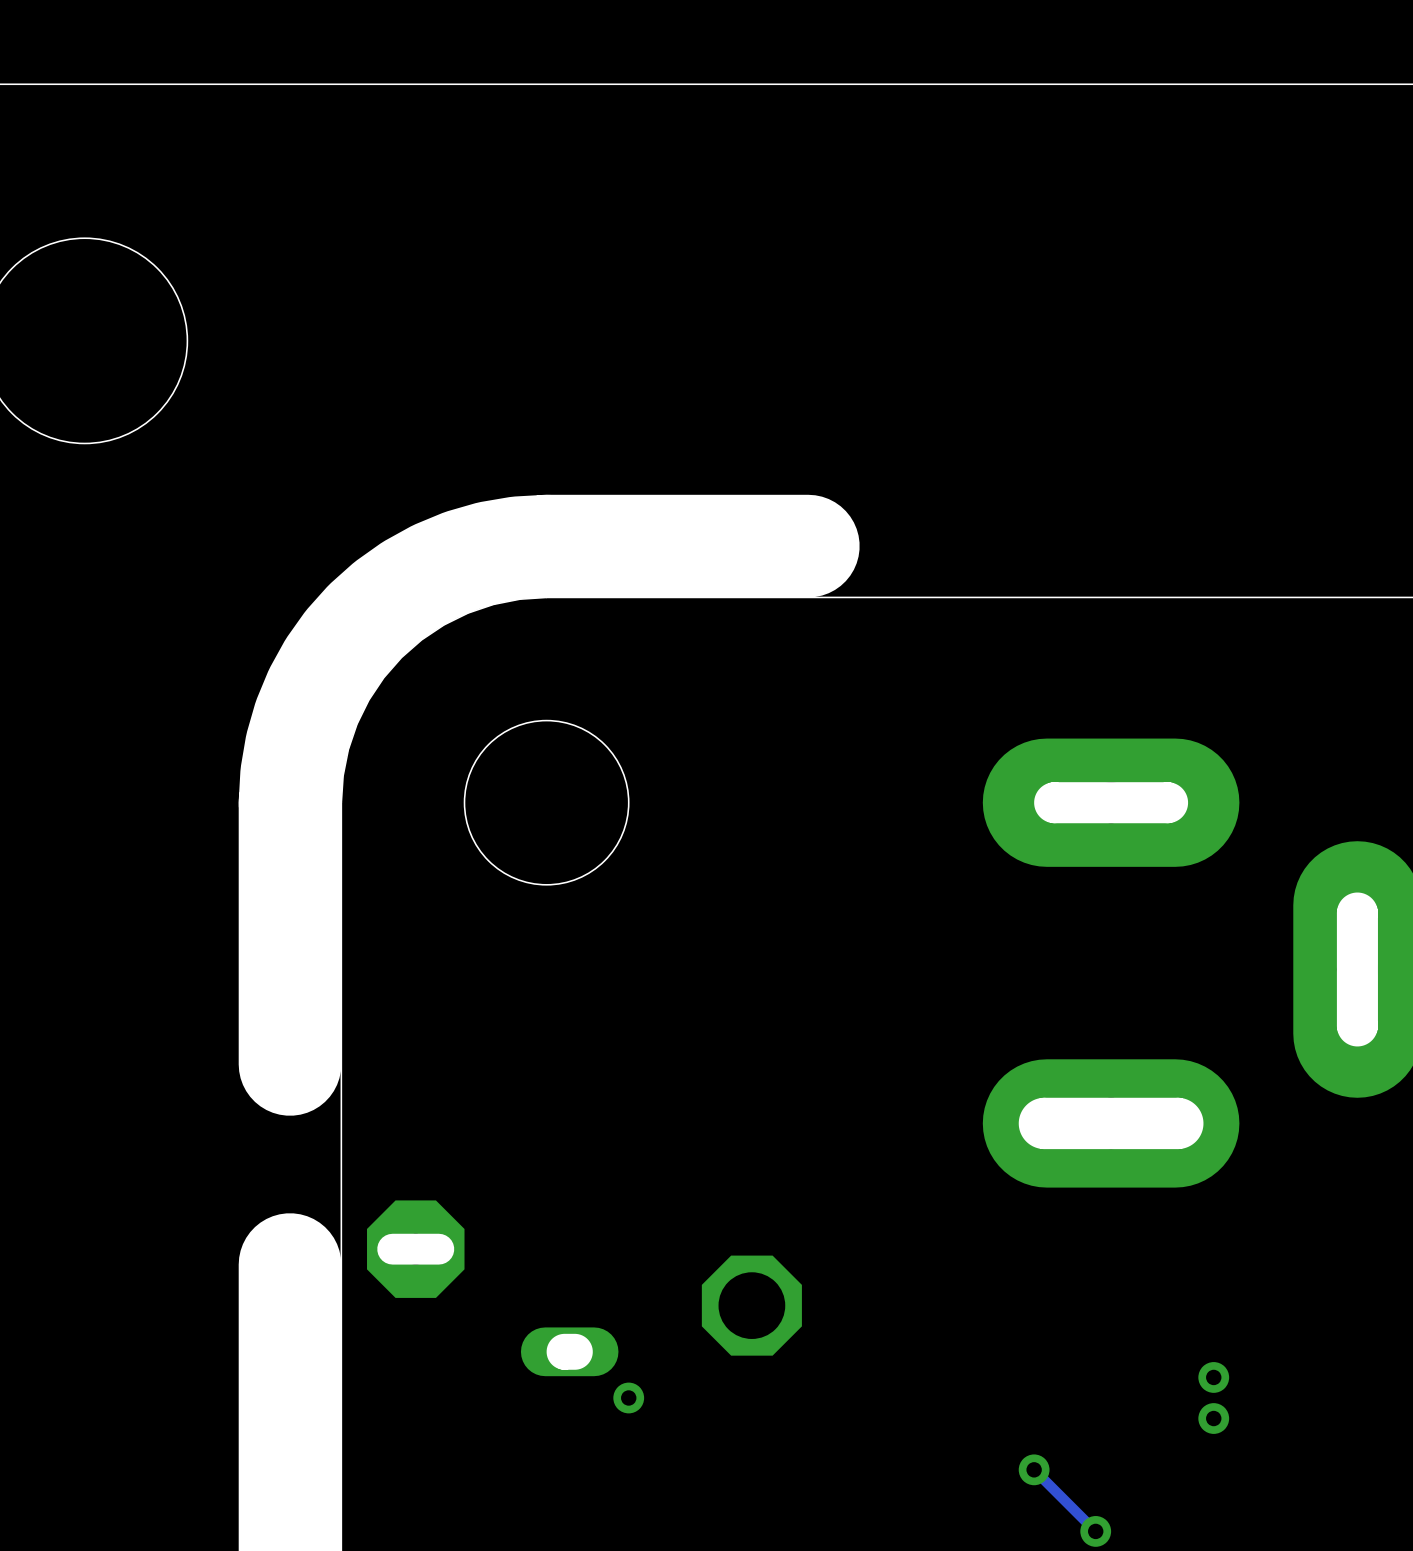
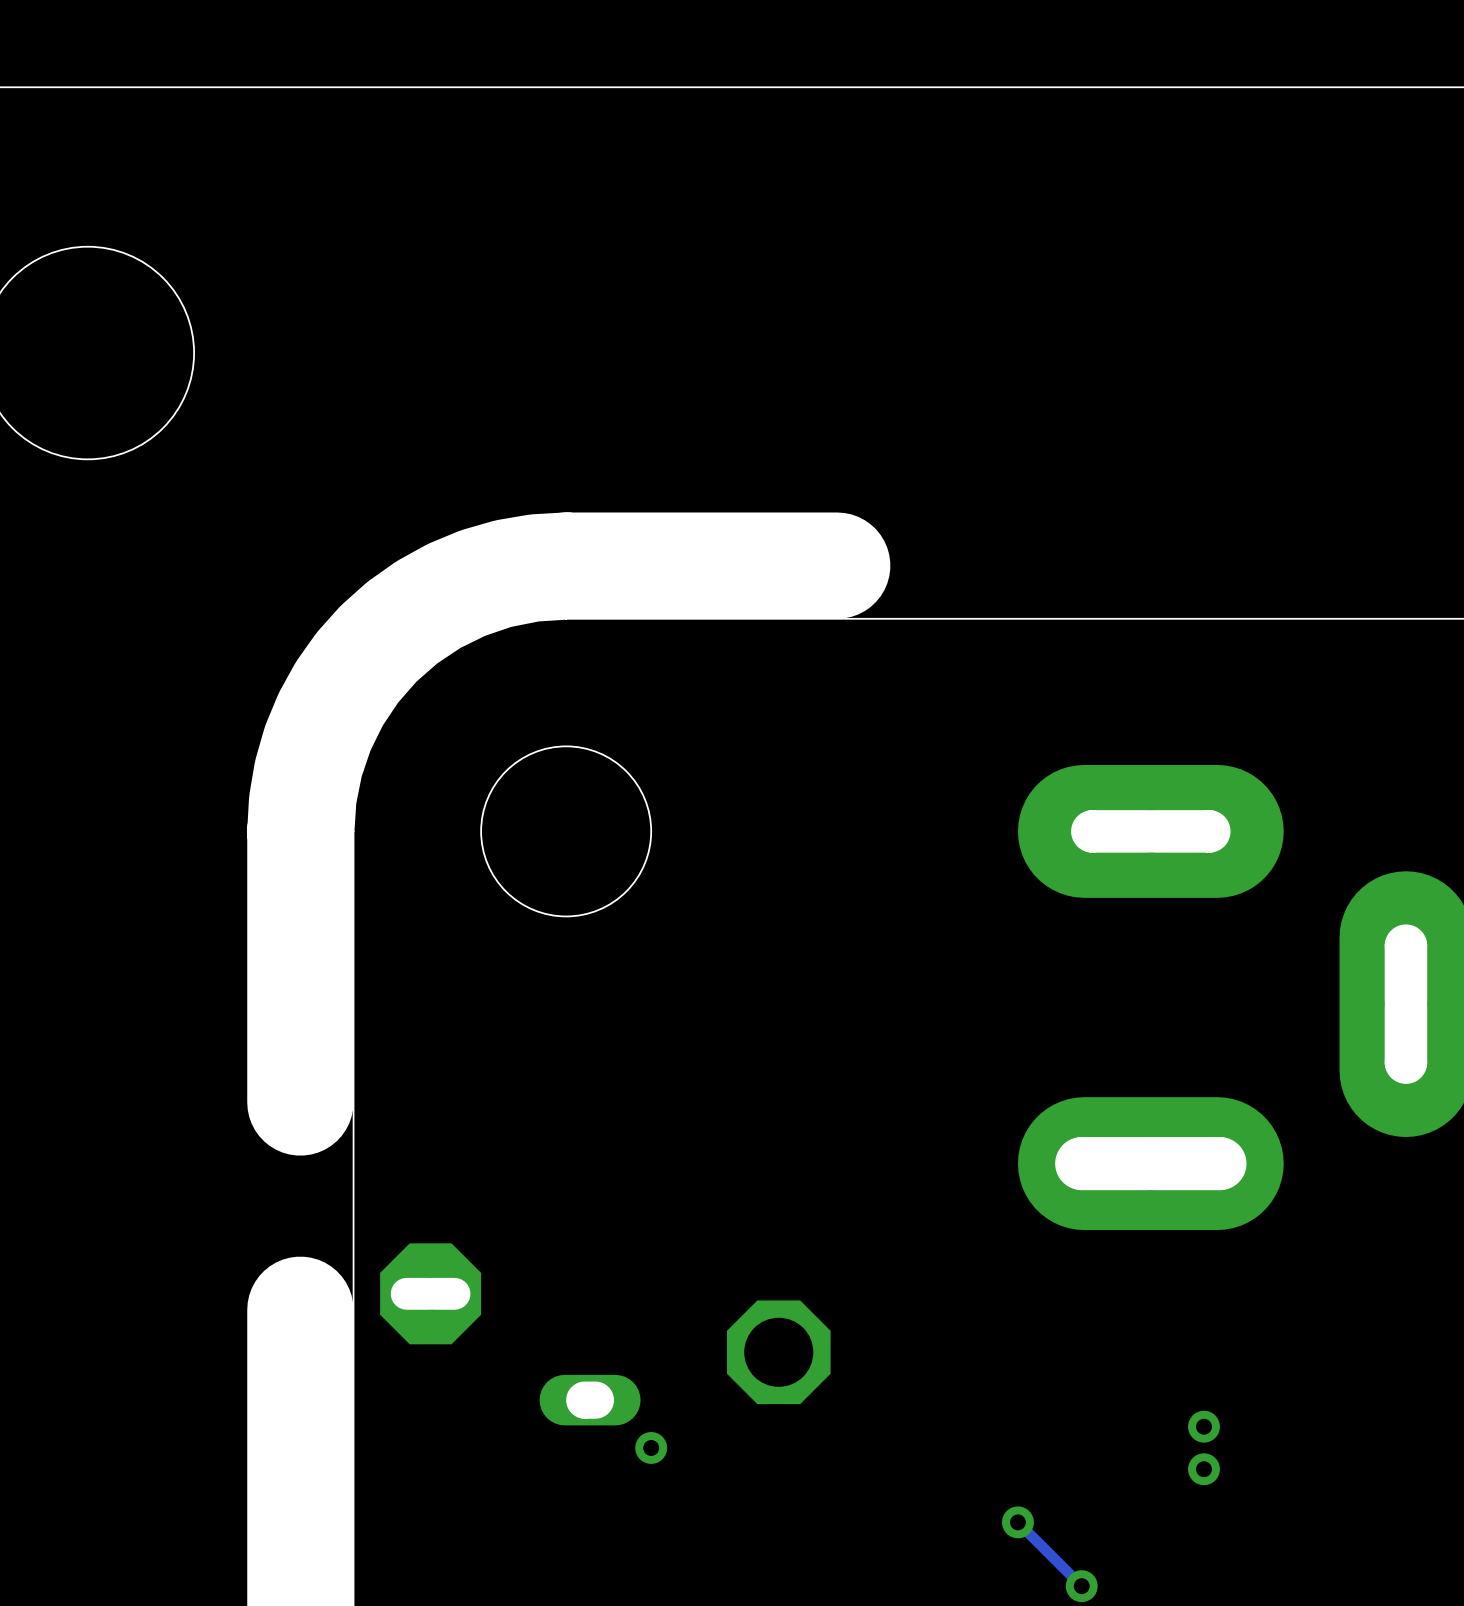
via: none -> (1203, 1426)
via: (1213, 1377) -> none
via: none -> (1203, 1469)
via: (1213, 1418) -> none
via: none -> (1017, 1522)
track: (1034, 1469) (1095, 1531) -> (1017, 1522) (1081, 1586)
via: (1034, 1469) -> none
via: none -> (1081, 1586)
via: (1095, 1531) -> none

